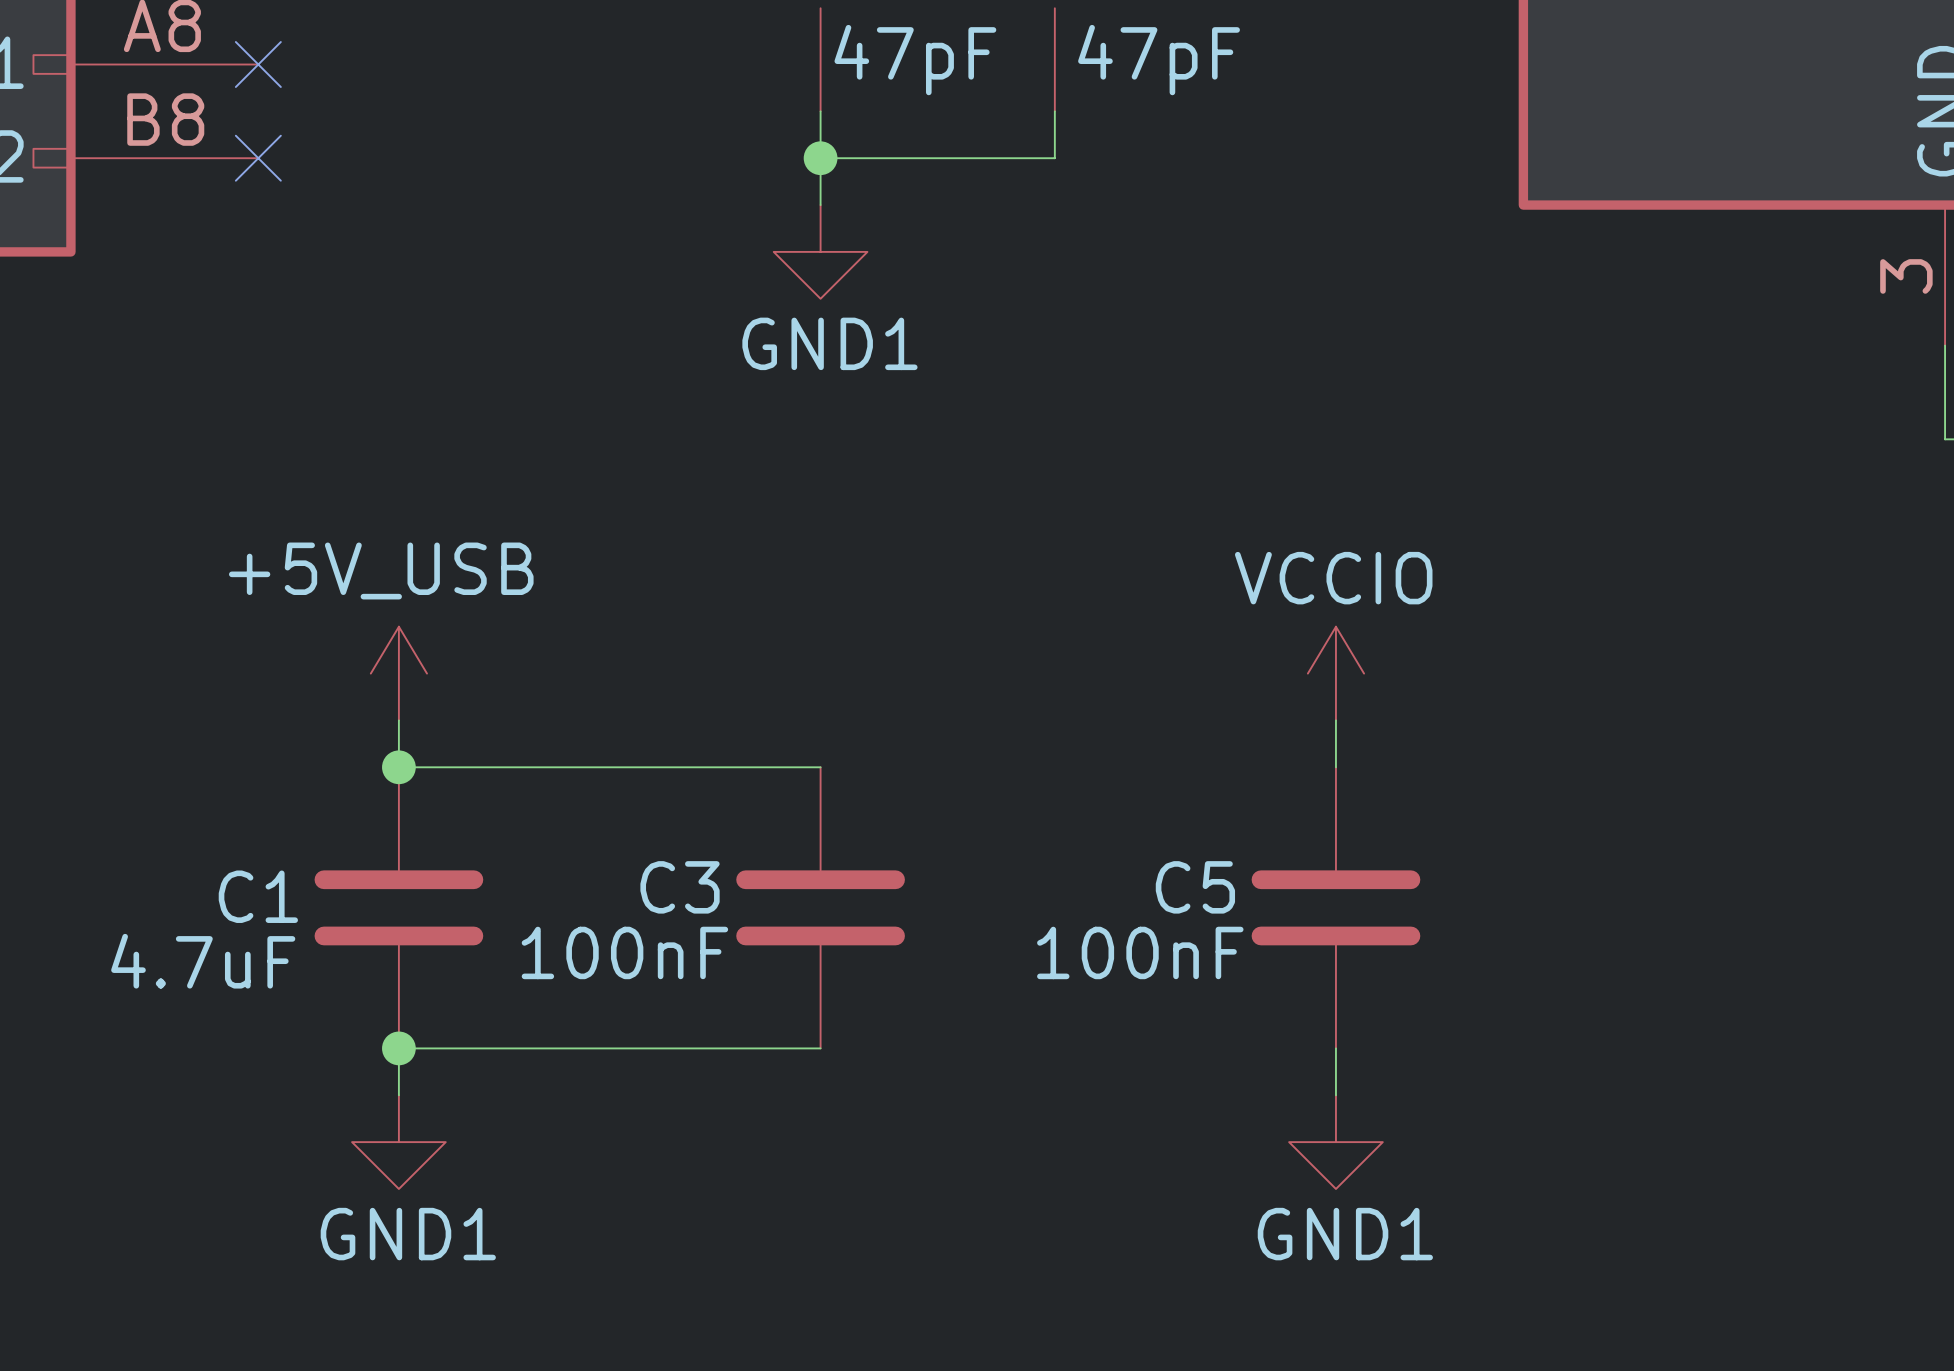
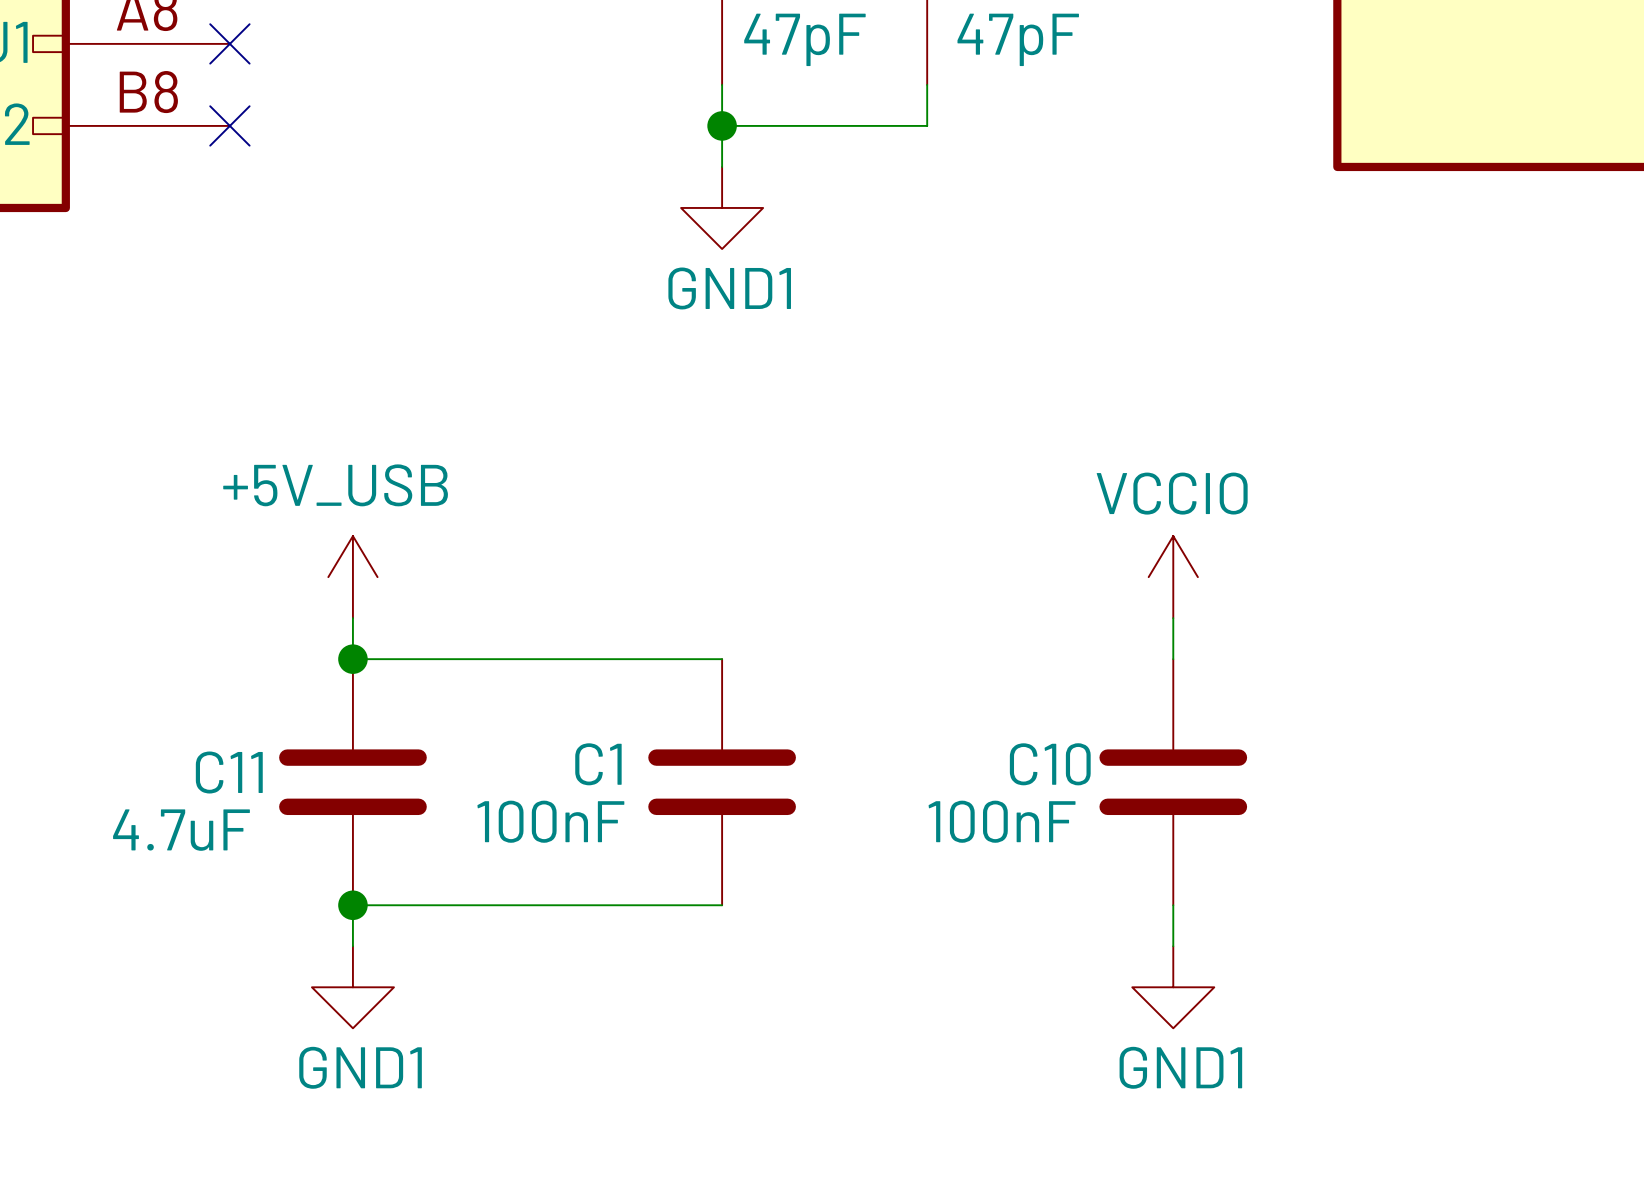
C3 name: C3 (680, 887) -> C1 (598, 764)
C5 name: C5 (1195, 887) -> C10 (1050, 764)
C1 name: C1 (258, 896) -> C11 (229, 772)

